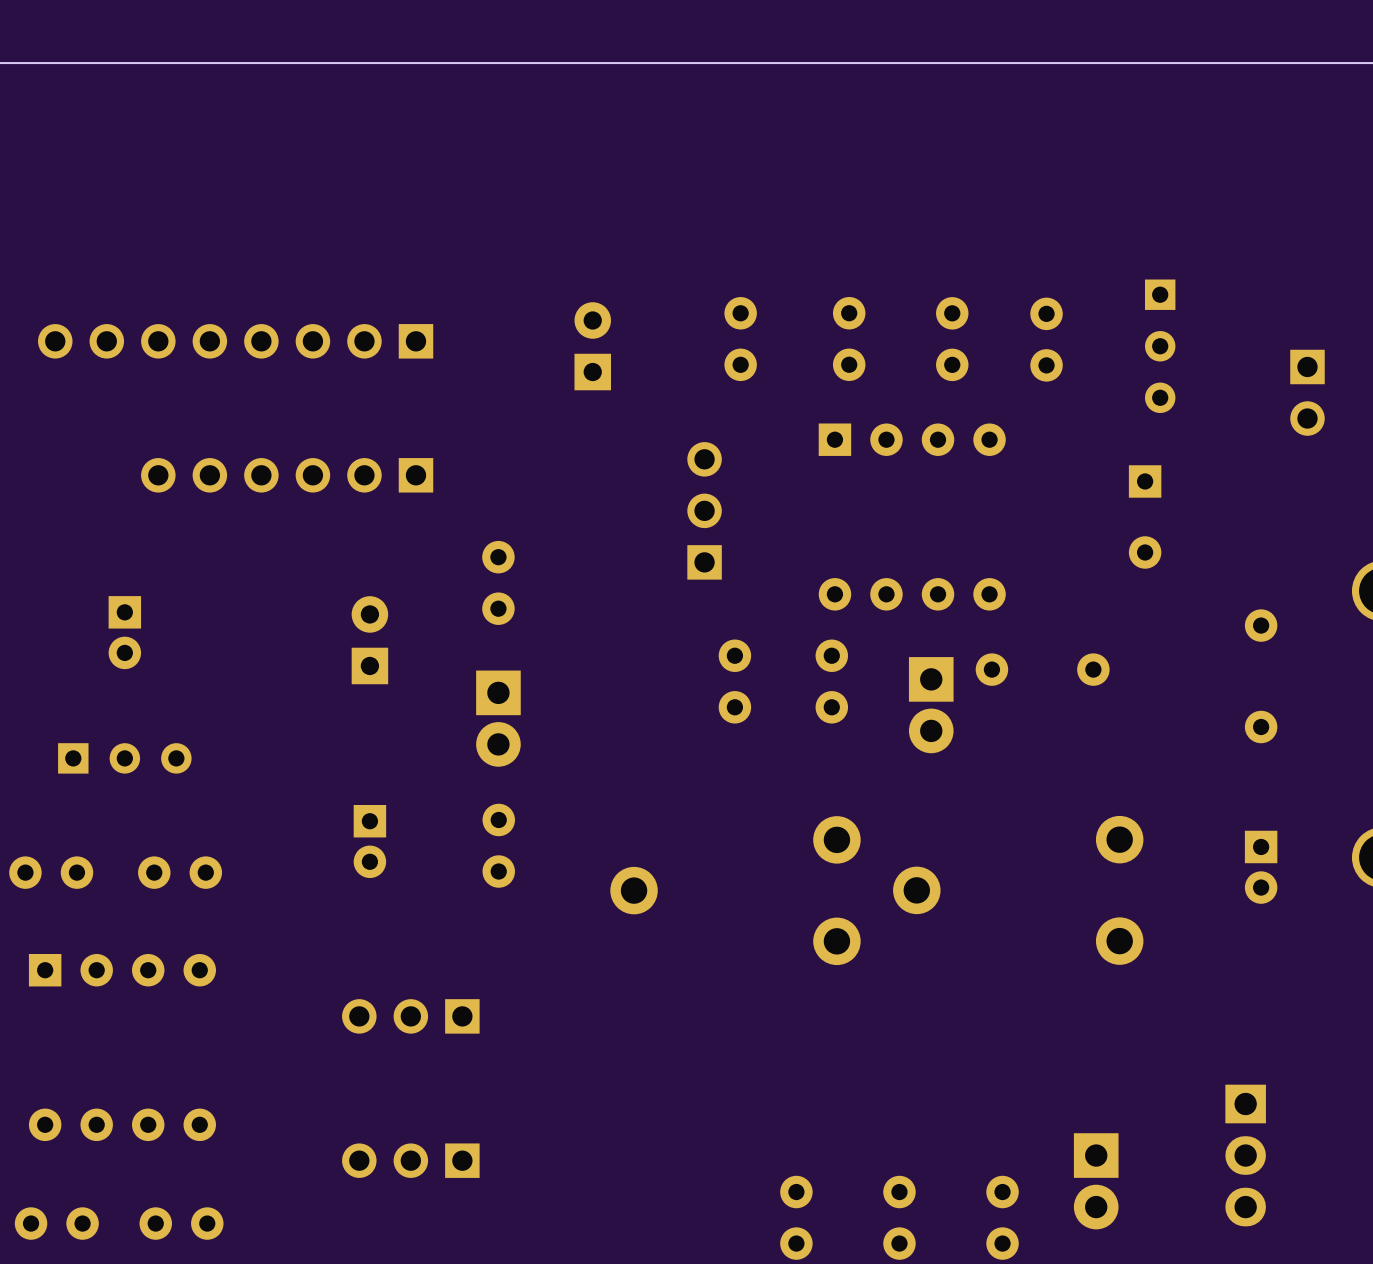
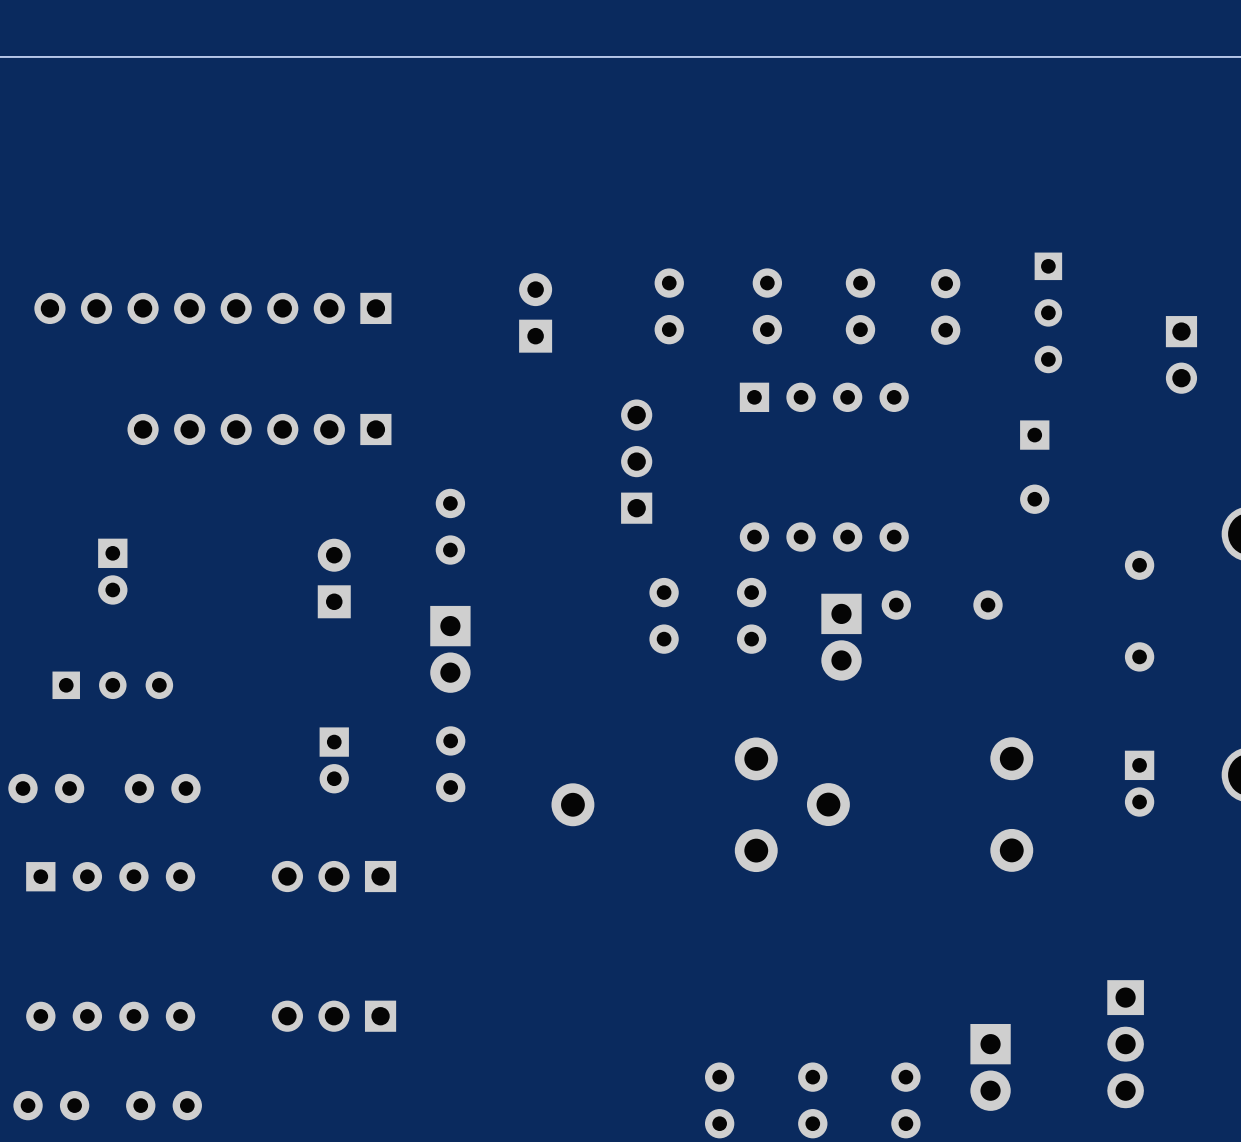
part: none -> (333, 876)
part: (410, 1016) -> none
part position: (410, 1160) -> (333, 1016)

